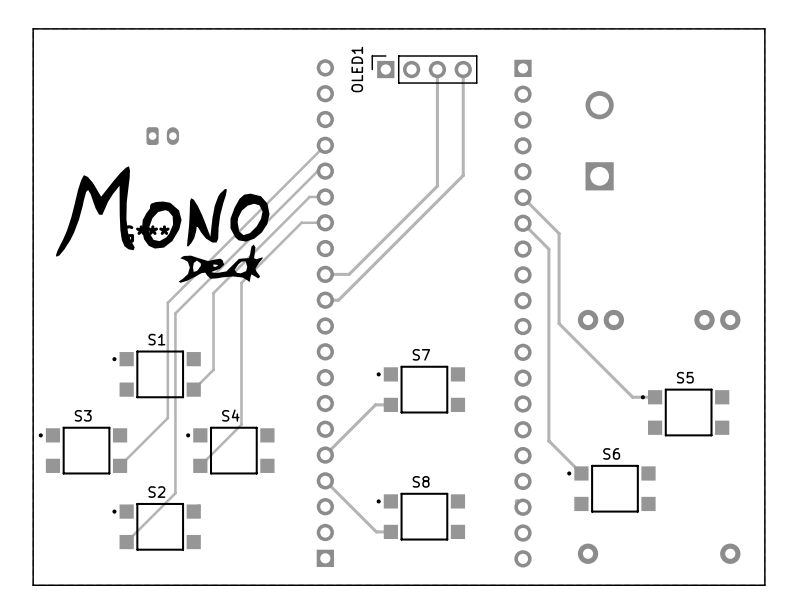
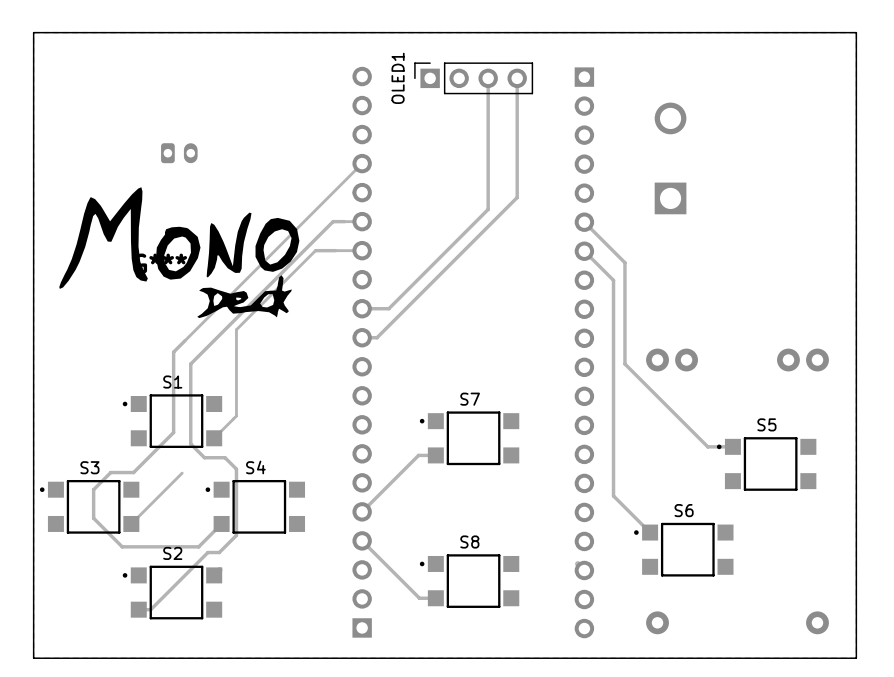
track: (317, 171) (175, 313) (175, 493) (126, 542) -> (344, 221) (333, 221) (190, 364) (190, 443) (204, 457) (225, 457) (236, 469) (236, 535) (219, 552) (207, 552) (150, 609) (138, 609)
track: (309, 196) (283, 222) -> (335, 250) (315, 250)
track: (301, 222) (241, 282) (241, 424) (200, 465) -> none
track: (167, 302) (167, 418) (165, 420) -> (185, 340) (173, 352) (173, 432) (133, 472) (110, 472) (93, 489) (93, 518) (122, 546) (198, 546) (221, 523)

